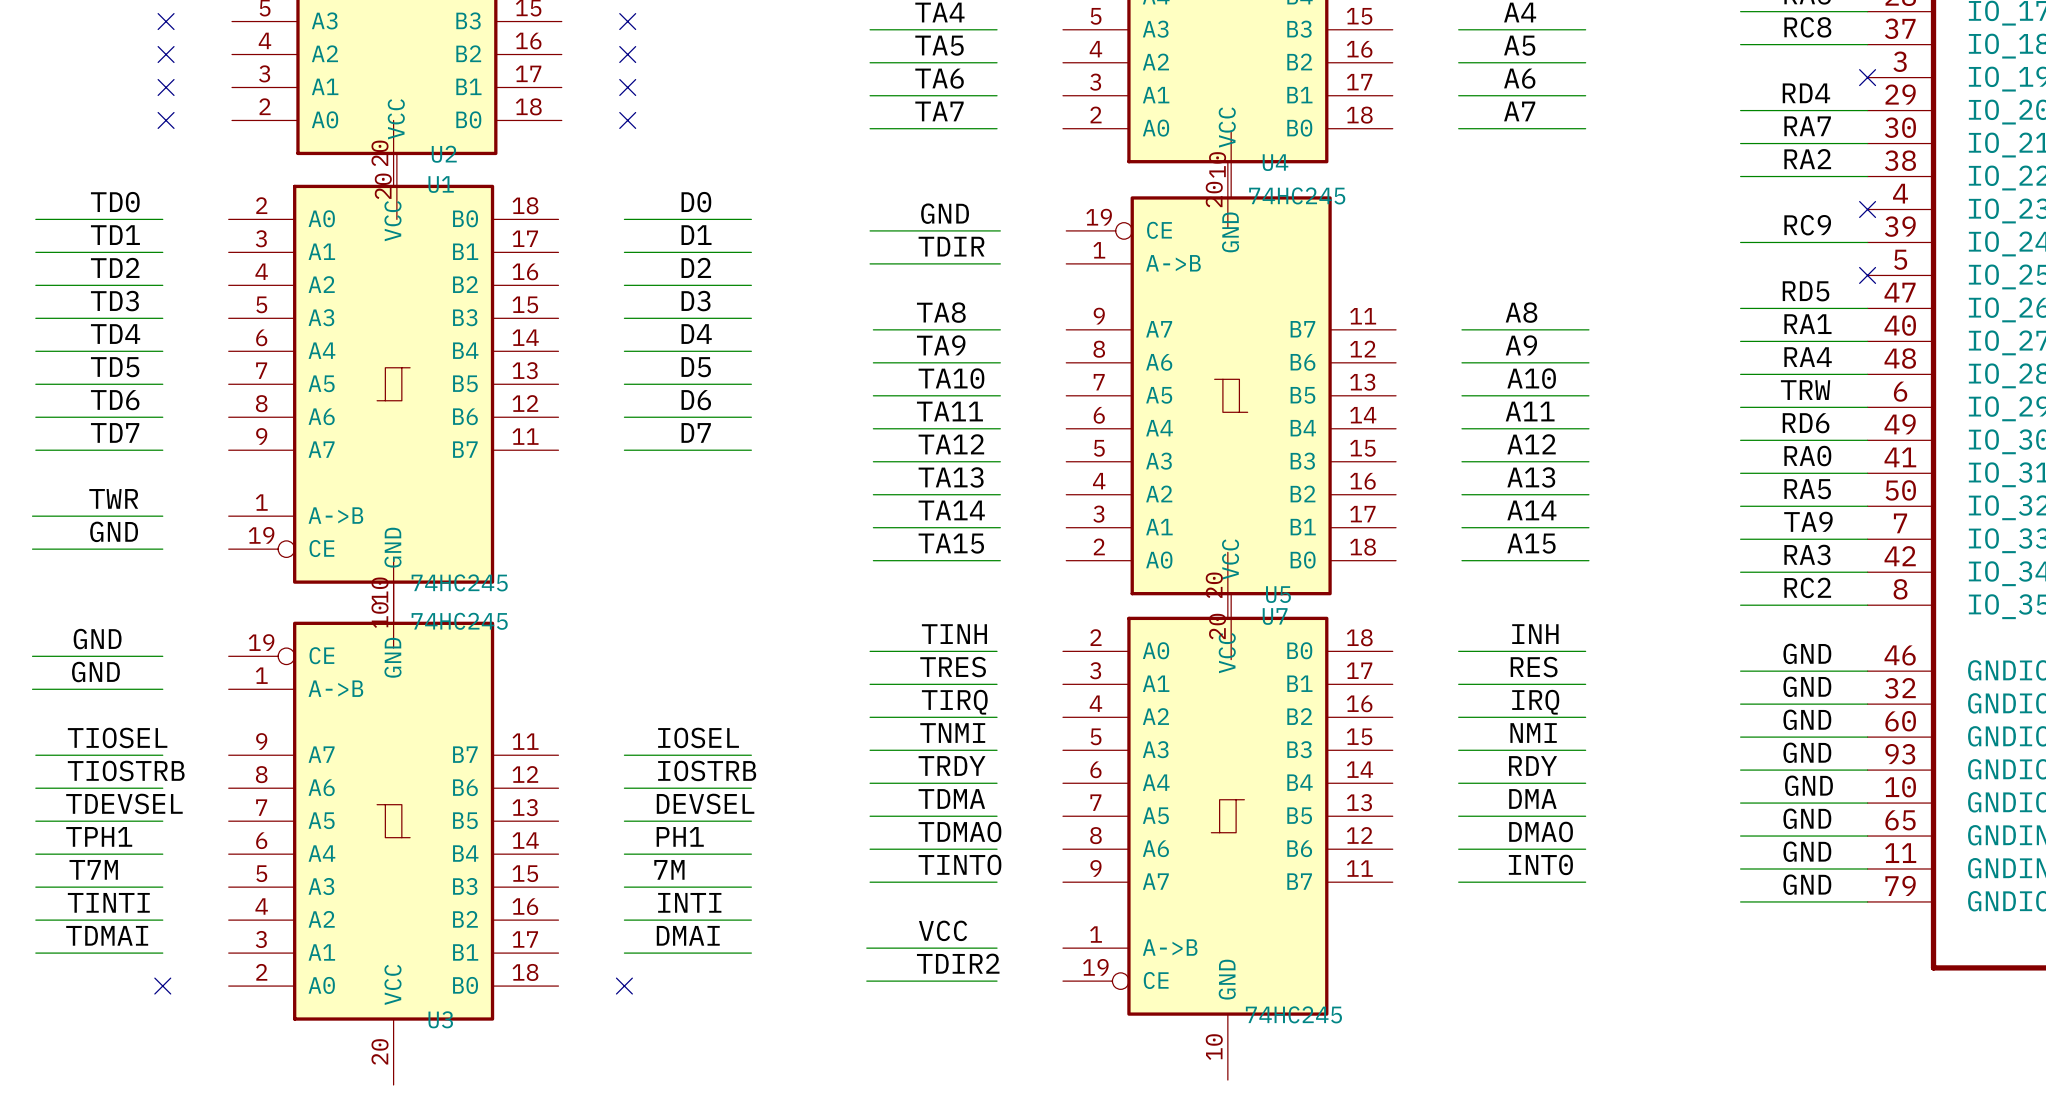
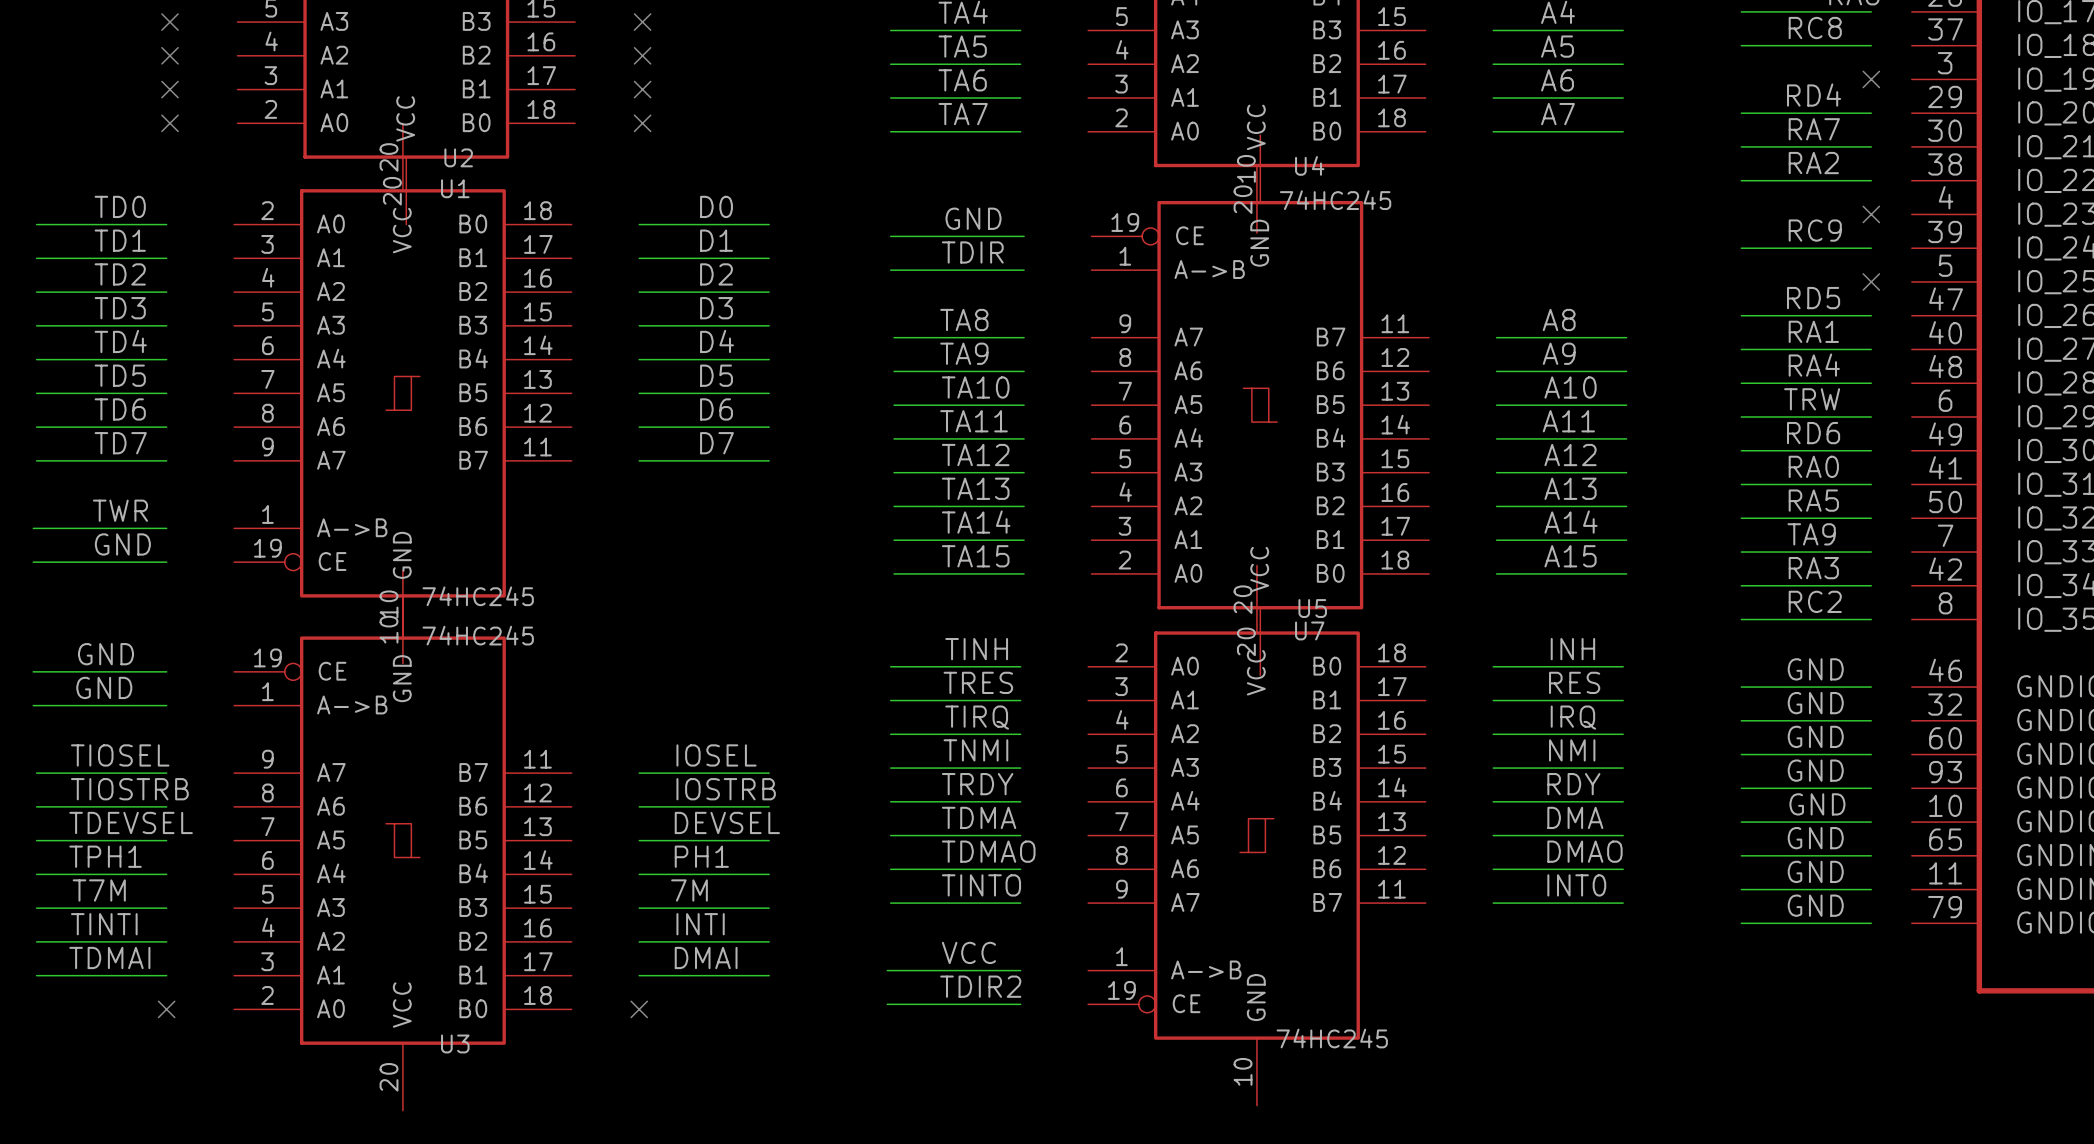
wire: (1828, 11) (1867, 11) -> (1741, 11) (1781, 11)
label position: RC8 (1807, 27) -> RC8 (1815, 28)
wire: (1828, 44) (1867, 44) -> (1741, 45) (1781, 45)
no-connect mark position: (1867, 77) -> (1871, 79)
label position: RD4 (1806, 93) -> RD4 (1814, 95)
wire: (1828, 110) (1867, 110) -> (1741, 113) (1781, 113)
label position: RA7 (1807, 126) -> RA7 (1814, 129)
wire: (1828, 143) (1867, 143) -> (1741, 146) (1781, 146)
label position: RA2 (1807, 159) -> RA2 (1813, 163)
wire: (1828, 176) (1867, 176) -> (1741, 180) (1781, 180)
no-connect mark: none -> (1871, 214)
no-connect mark: (1867, 209) -> none
label position: RC9 (1807, 225) -> RC9 (1815, 230)
wire: (1828, 242) (1867, 242) -> (1741, 248) (1781, 248)
no-connect mark: none -> (1871, 281)
no-connect mark: (1867, 275) -> none
label position: RD5 (1806, 291) -> RD5 (1813, 298)
wire: (1828, 308) (1867, 308) -> (1741, 315) (1781, 315)
label position: RA1 (1807, 324) -> RA1 (1813, 331)
wire: (1828, 341) (1867, 341) -> (1741, 349) (1781, 349)
label position: RA4 (1808, 357) -> RA4 (1814, 365)
wire: (1828, 374) (1867, 374) -> (1741, 383) (1781, 383)
label position: TRW (1805, 390) -> TRW (1812, 399)
wire: (1828, 407) (1867, 407) -> (1741, 416) (1781, 416)
label position: RD6 (1806, 423) -> RD6 (1813, 433)
wire: (1828, 440) (1867, 440) -> (1741, 450) (1781, 450)
label position: RA0 (1807, 456) -> RA0 (1813, 466)
wire: (1828, 473) (1867, 473) -> (1741, 484) (1781, 484)
label position: RA5 (1807, 489) -> RA5 (1813, 500)
wire: (1828, 506) (1867, 506) -> (1741, 518) (1781, 518)
label position: TA9 (1808, 521) -> TA9 (1811, 534)
wire: (1828, 539) (1867, 539) -> (1741, 552) (1781, 552)
label position: RA3 (1807, 554) -> RA3 (1813, 568)
wire: (1828, 572) (1867, 572) -> (1741, 585) (1781, 585)
label position: RC2 (1807, 587) -> RC2 (1815, 601)
wire: (1828, 605) (1867, 605) -> (1741, 619) (1781, 619)
label: none -> GND (1815, 669)
label: GND (1807, 653) -> none
wire: (1828, 671) (1867, 671) -> (1741, 687) (1781, 687)
label: none -> GND (1815, 703)
label: GND (1807, 686) -> none
wire: (1828, 704) (1867, 704) -> (1741, 720) (1781, 720)
label: none -> GND (1815, 736)
label: GND (1807, 719) -> none
wire: (1828, 737) (1867, 737) -> (1741, 754) (1781, 754)
label: none -> GND (1815, 770)
label: GND (1807, 752) -> none
wire: (1828, 770) (1867, 770) -> (1741, 788) (1781, 788)
label: none -> GND (1817, 804)
label: GND (1809, 785) -> none
wire: (1828, 803) (1867, 803) -> (1741, 822) (1781, 822)
label: none -> GND (1815, 838)
label: GND (1807, 818) -> none
wire: (1828, 836) (1867, 836) -> (1741, 855) (1781, 855)
label: none -> GND (1815, 871)
label: GND (1807, 851) -> none
wire: (1828, 868) (1867, 868) -> (1741, 889) (1781, 889)
label: none -> GND (1815, 905)
label: GND (1807, 884) -> none
wire: (1828, 901) (1867, 901) -> (1741, 923) (1781, 923)

